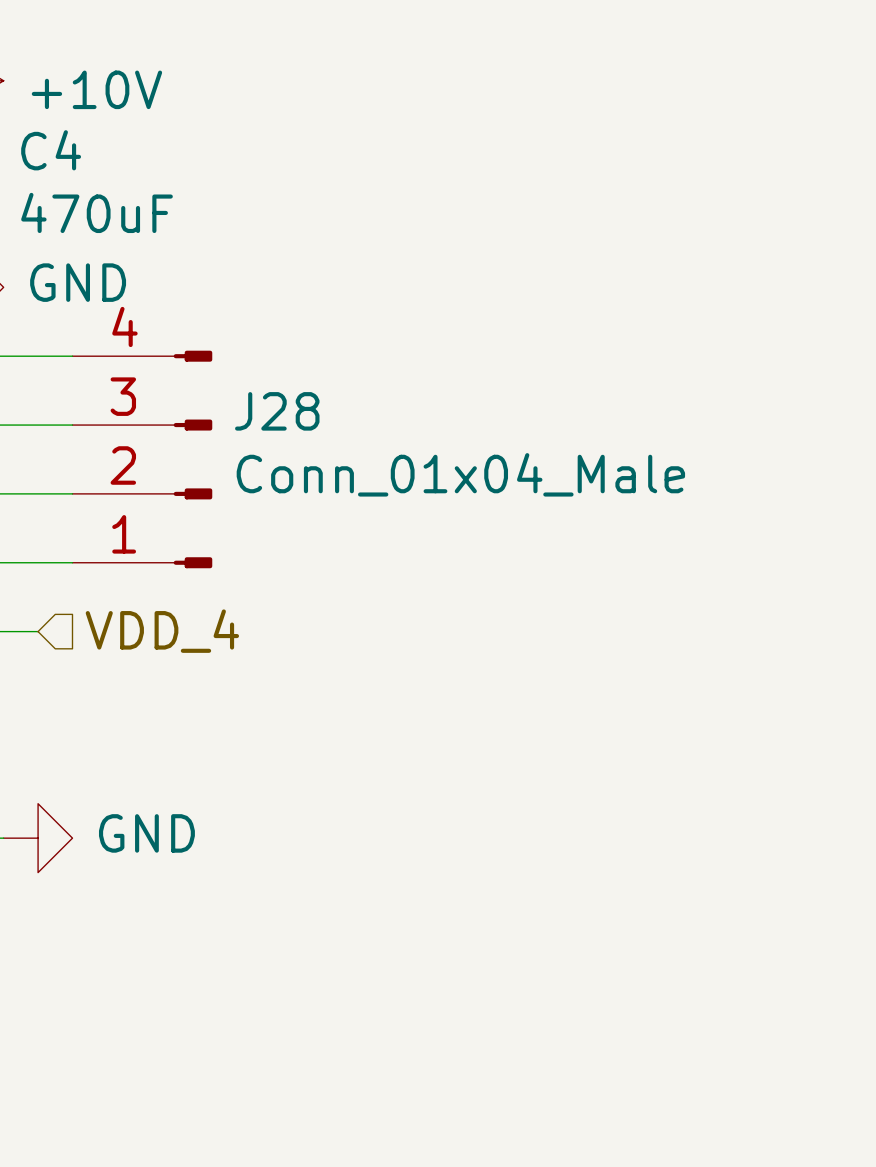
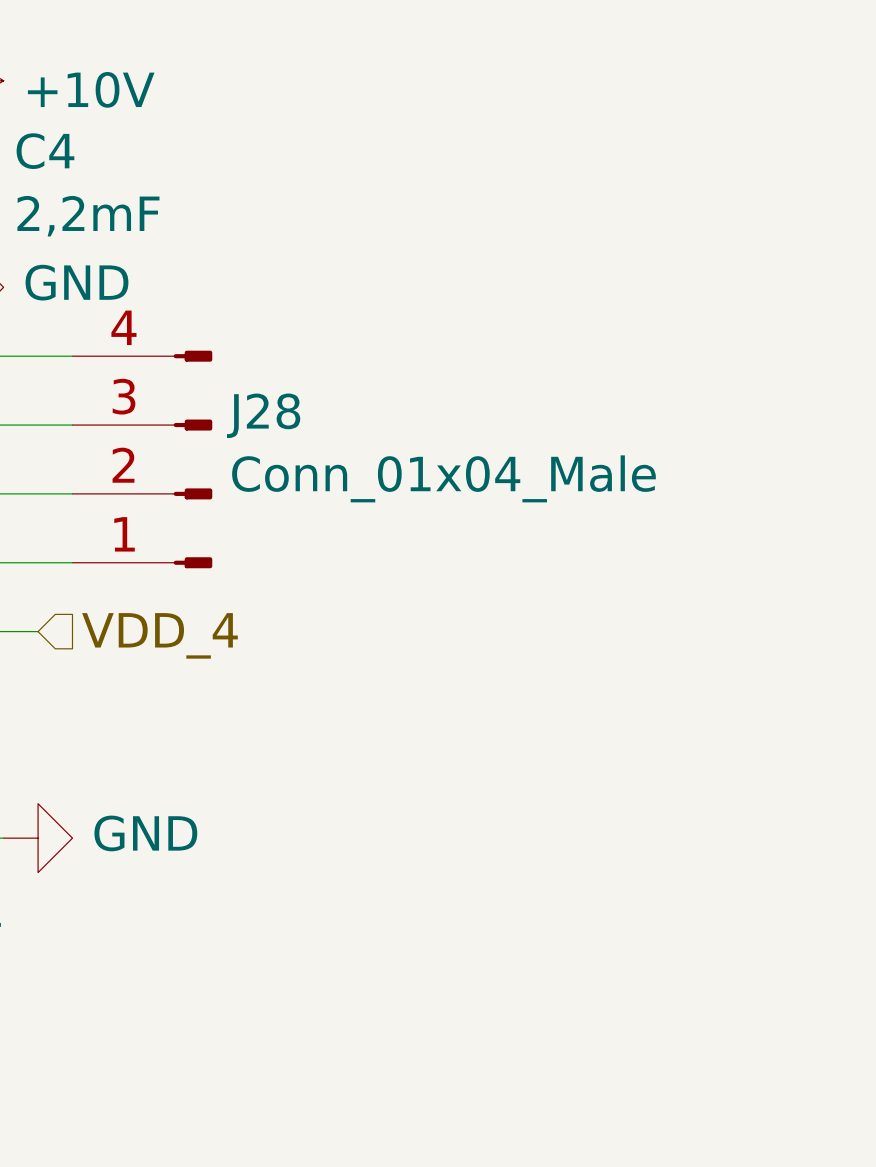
C4 value: 470uF (97, 212) -> 2,2mF (88, 216)

